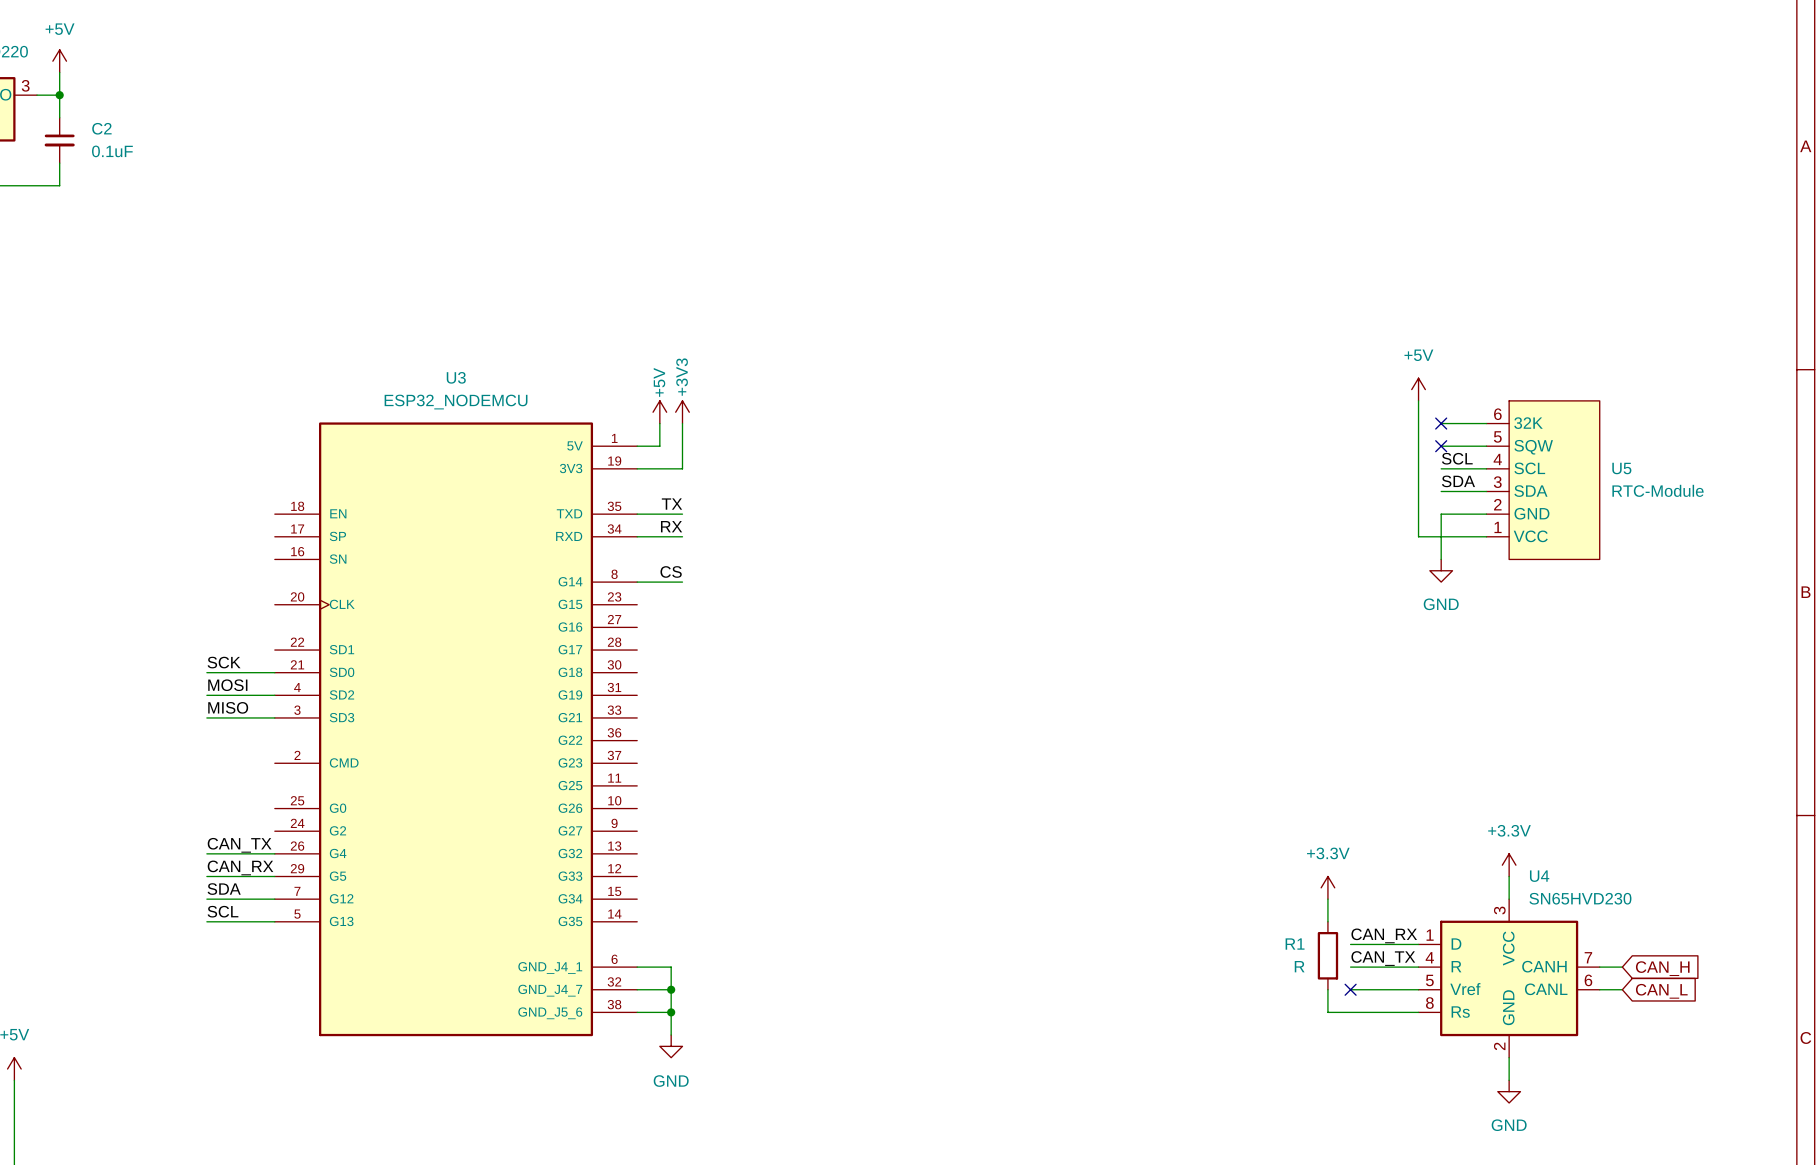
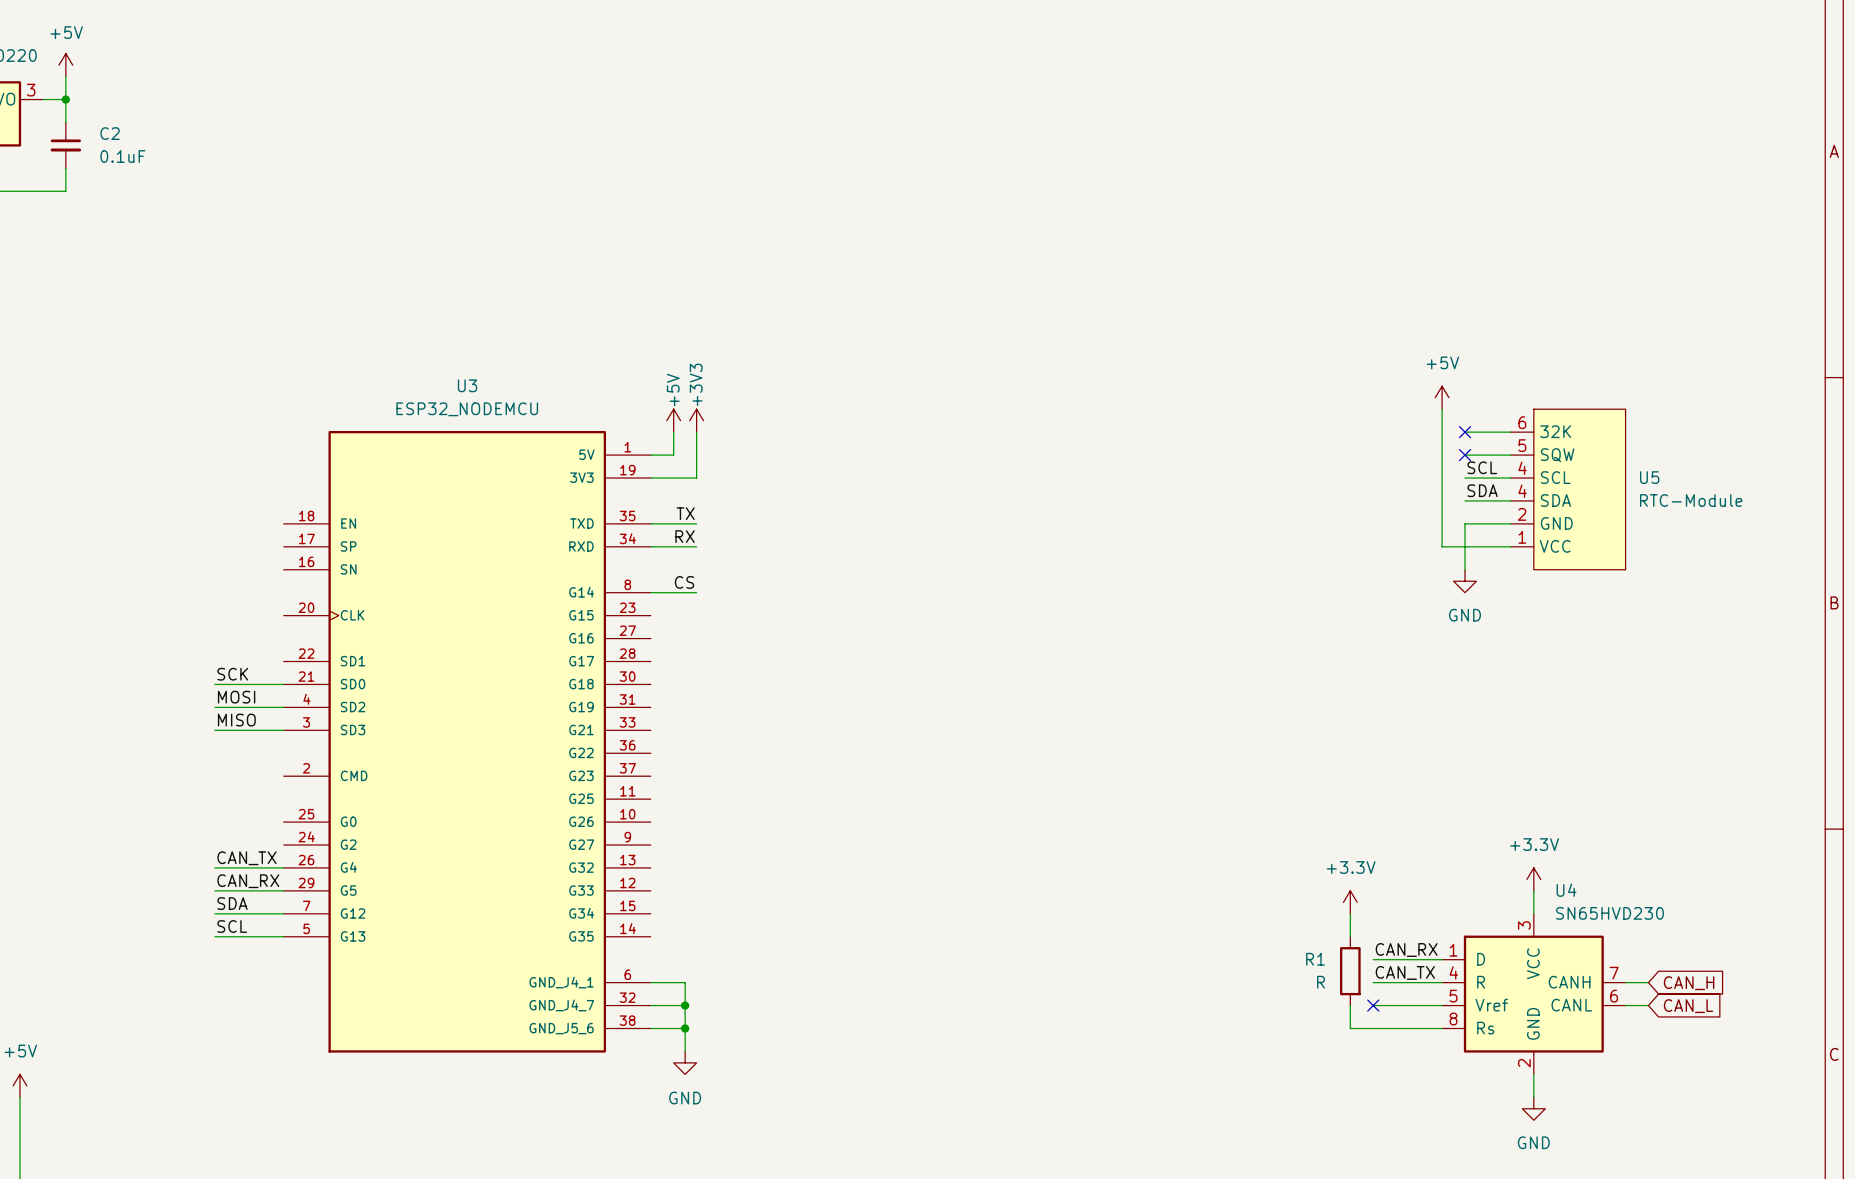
U5 pin number: 3 (1497, 482) -> 4 (1522, 491)

